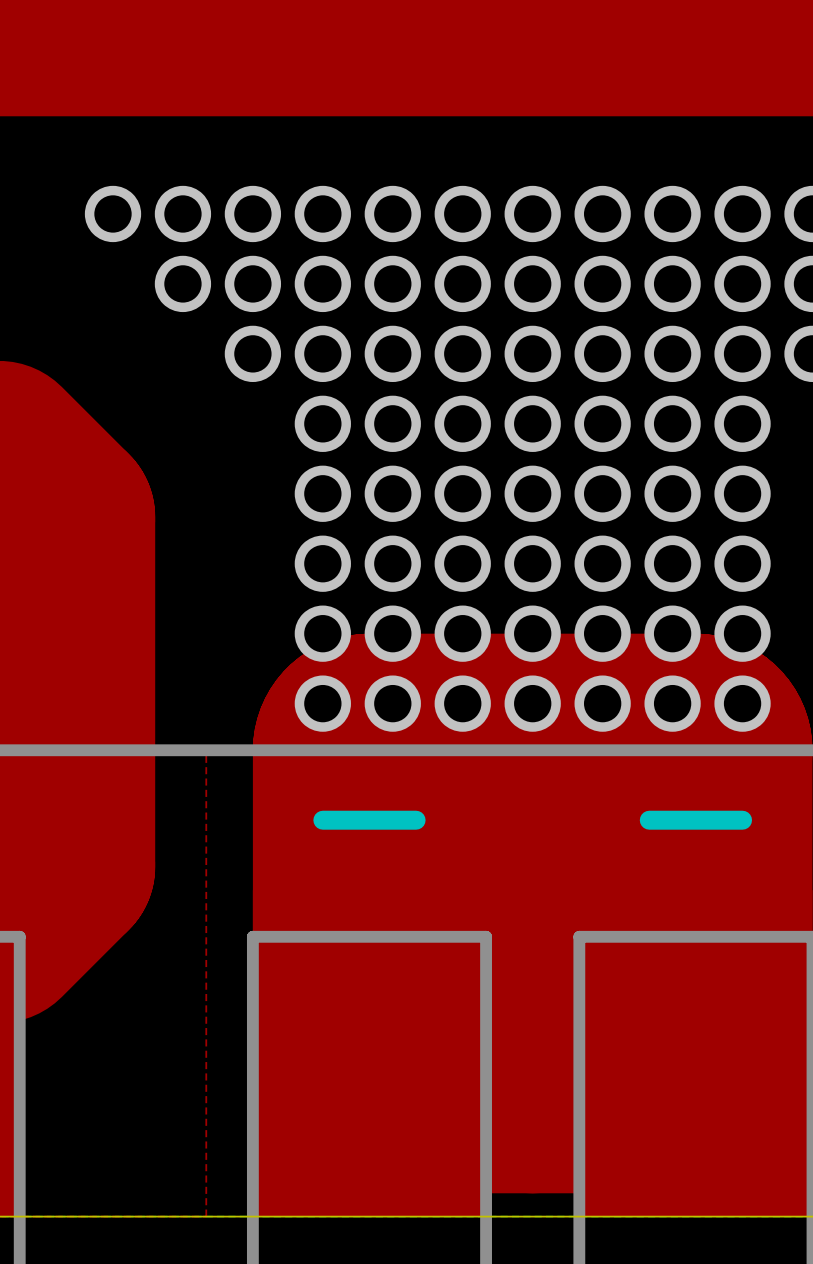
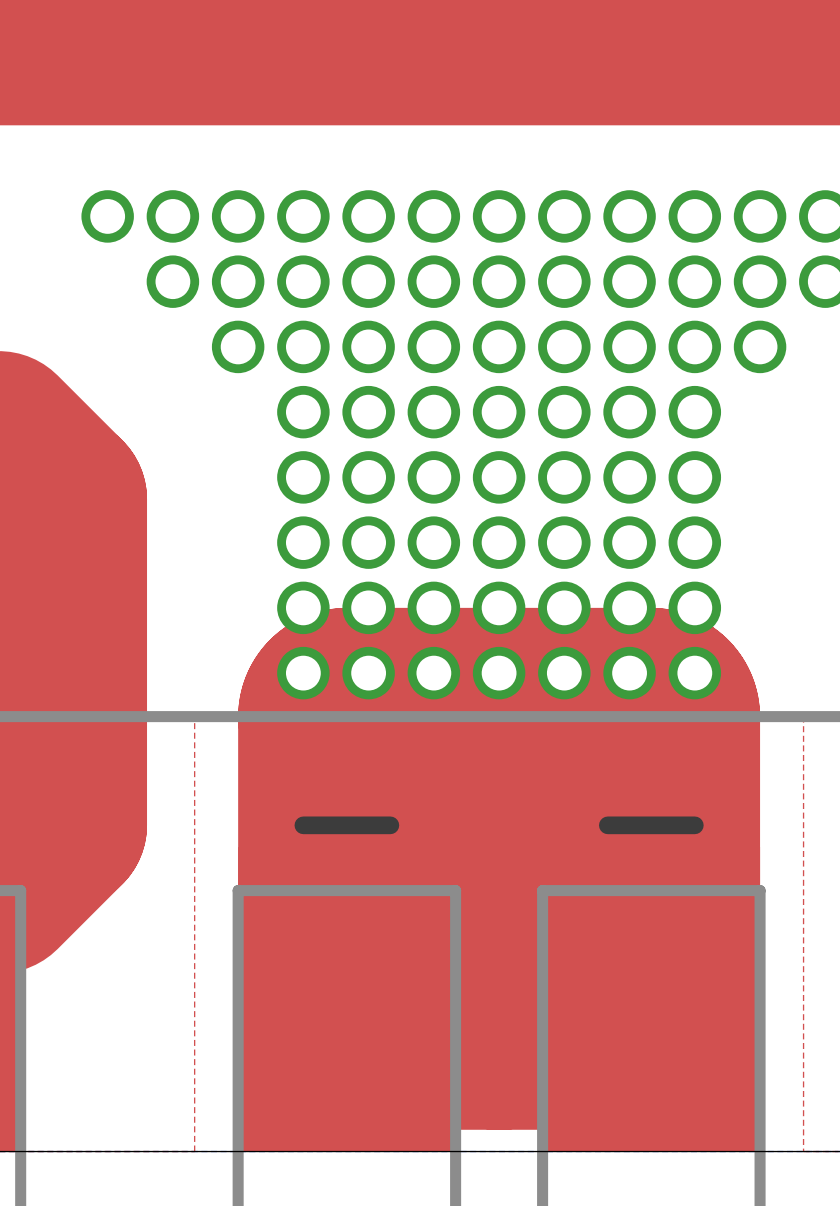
line: (322, 820) (416, 820) -> (303, 825) (390, 825)
line: (649, 820) (742, 820) -> (607, 825) (694, 825)

